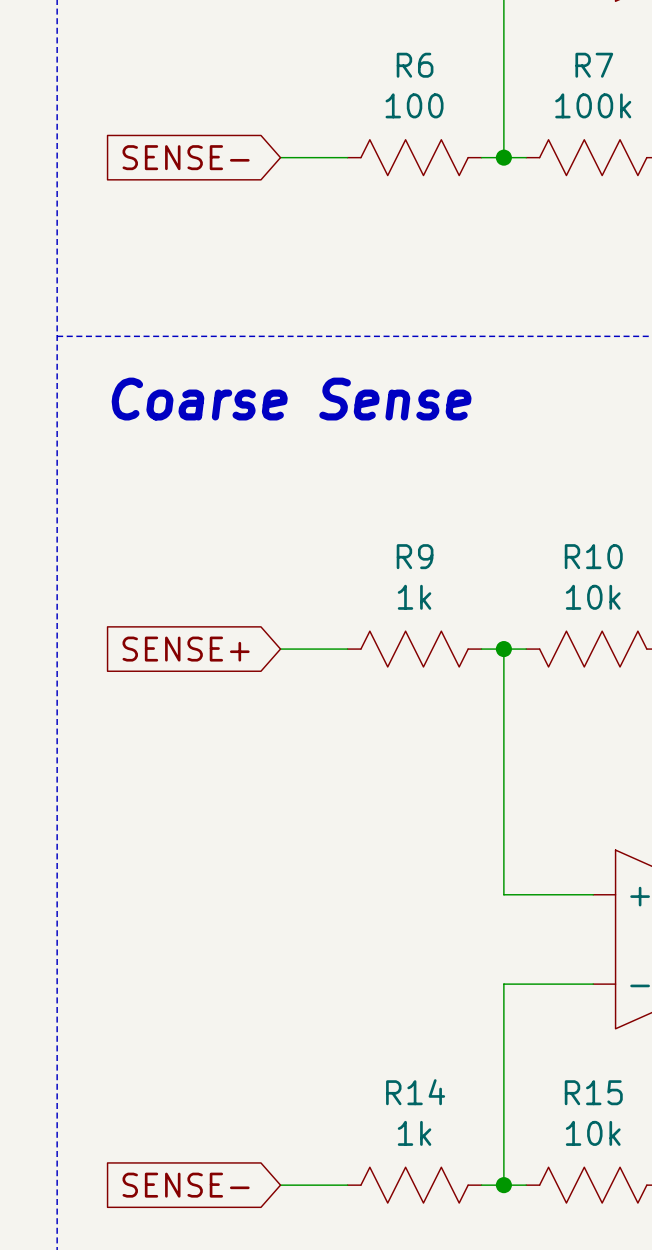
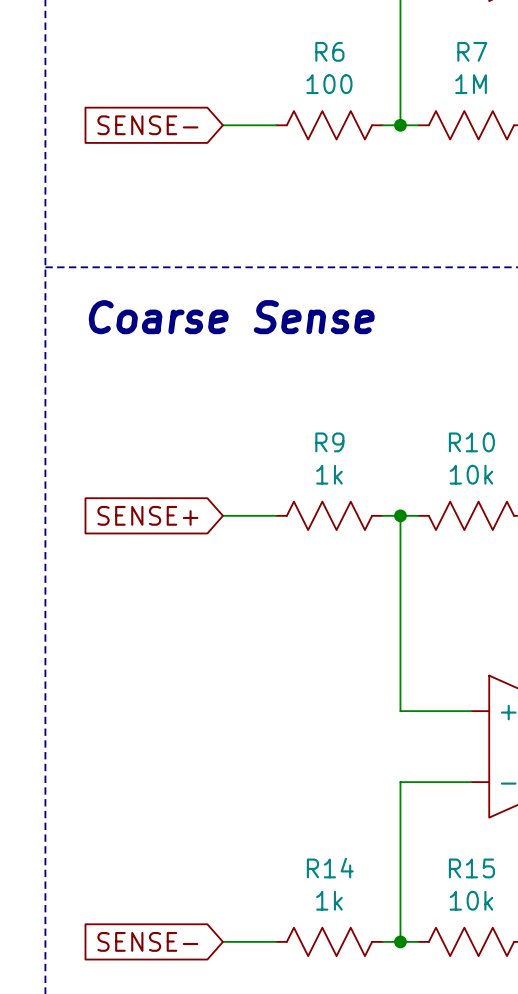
R7 value: 100k (593, 105) -> 1M (471, 84)

